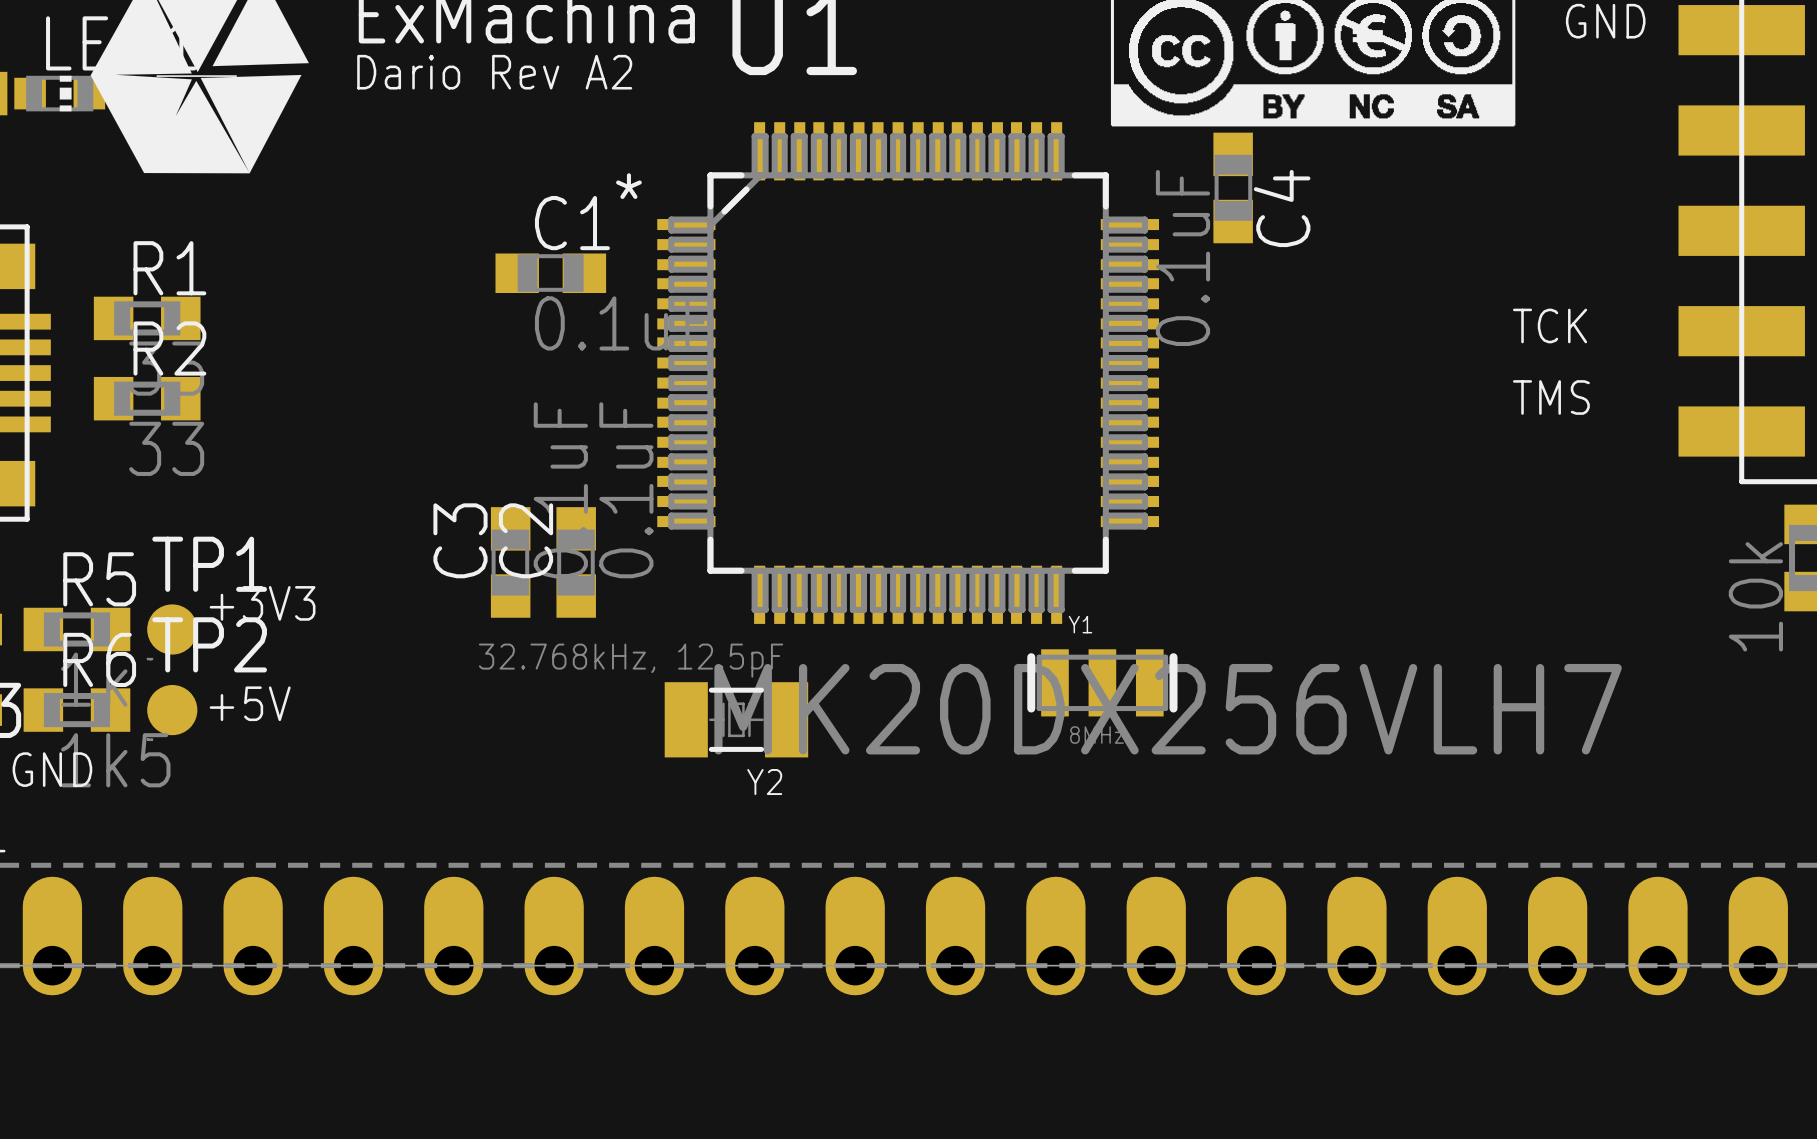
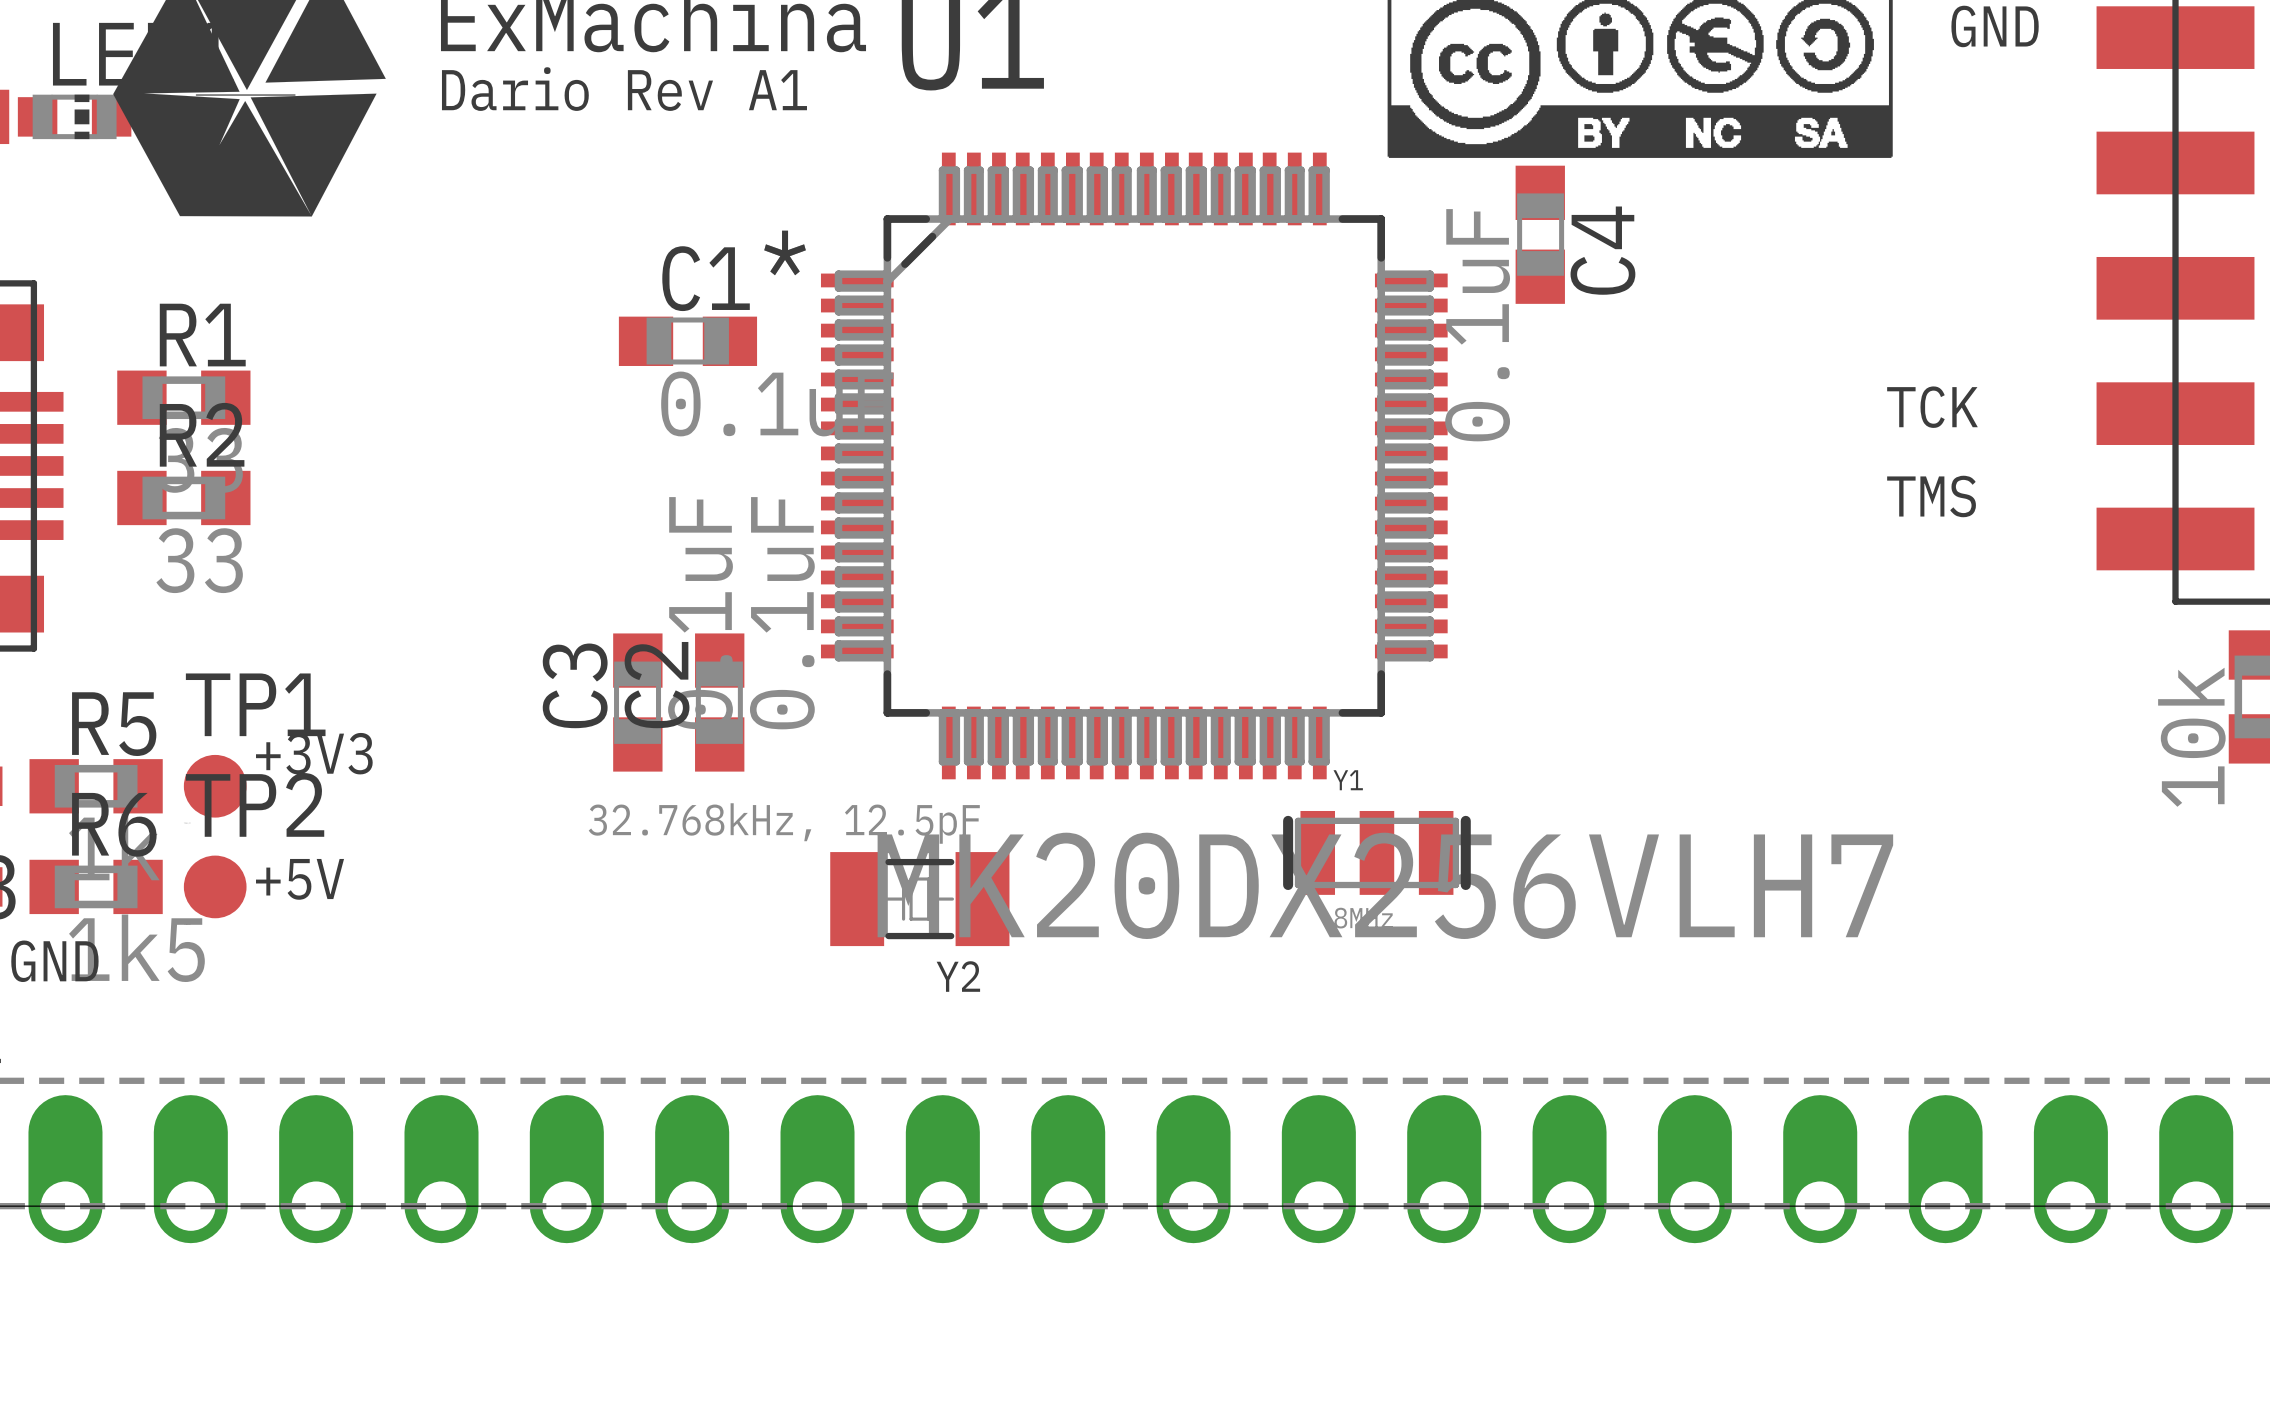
text: Dario Rev A2 (494, 72) -> Dario Rev A1 (624, 89)

